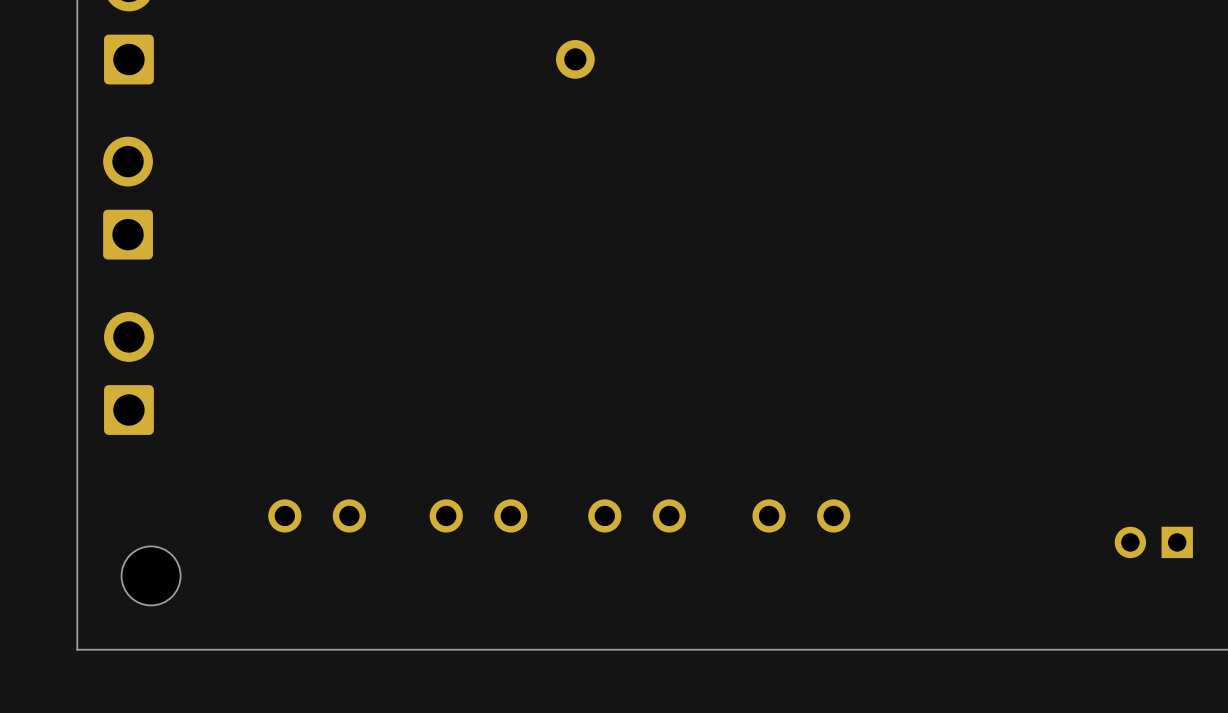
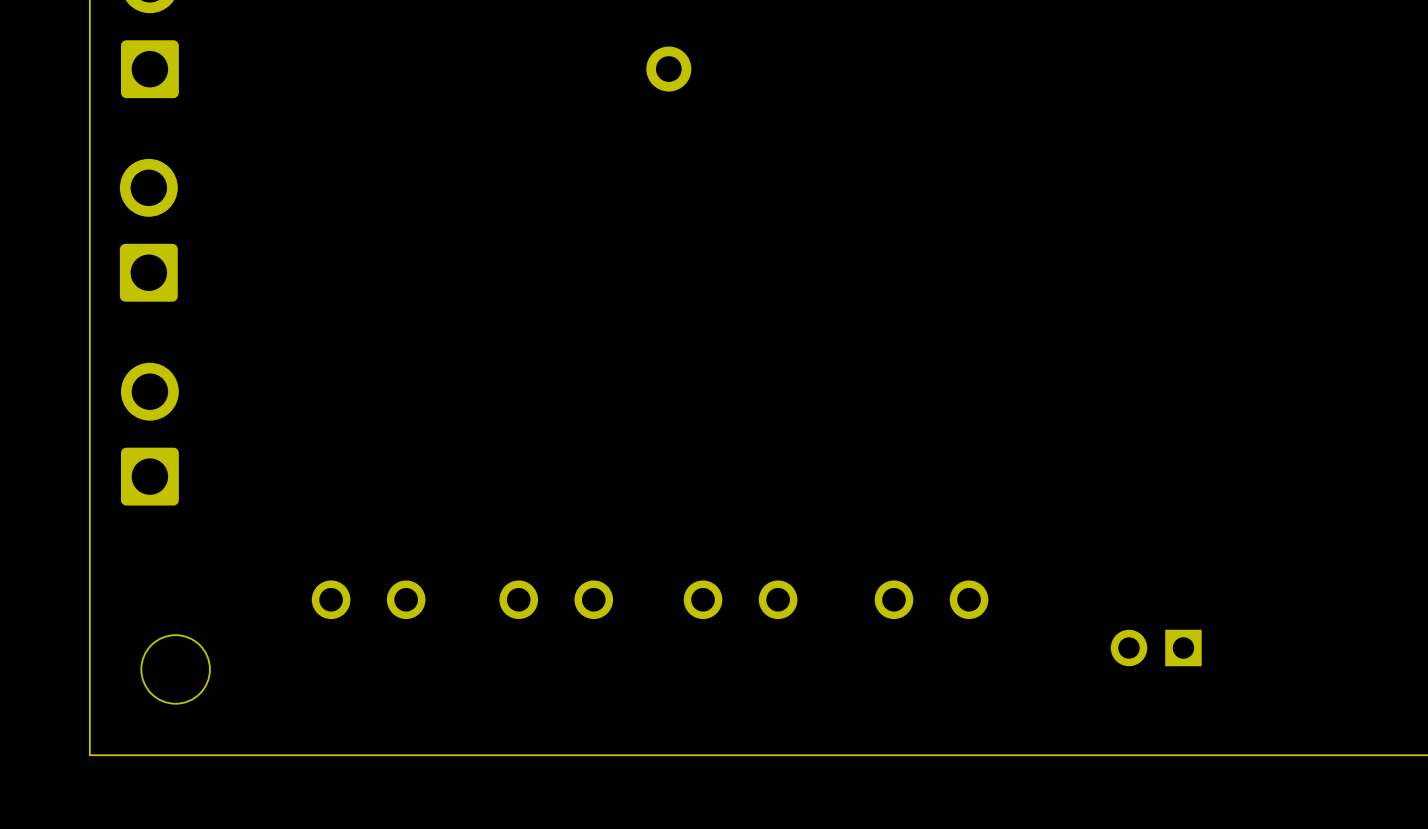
part position: (1153, 542) -> (1156, 648)

